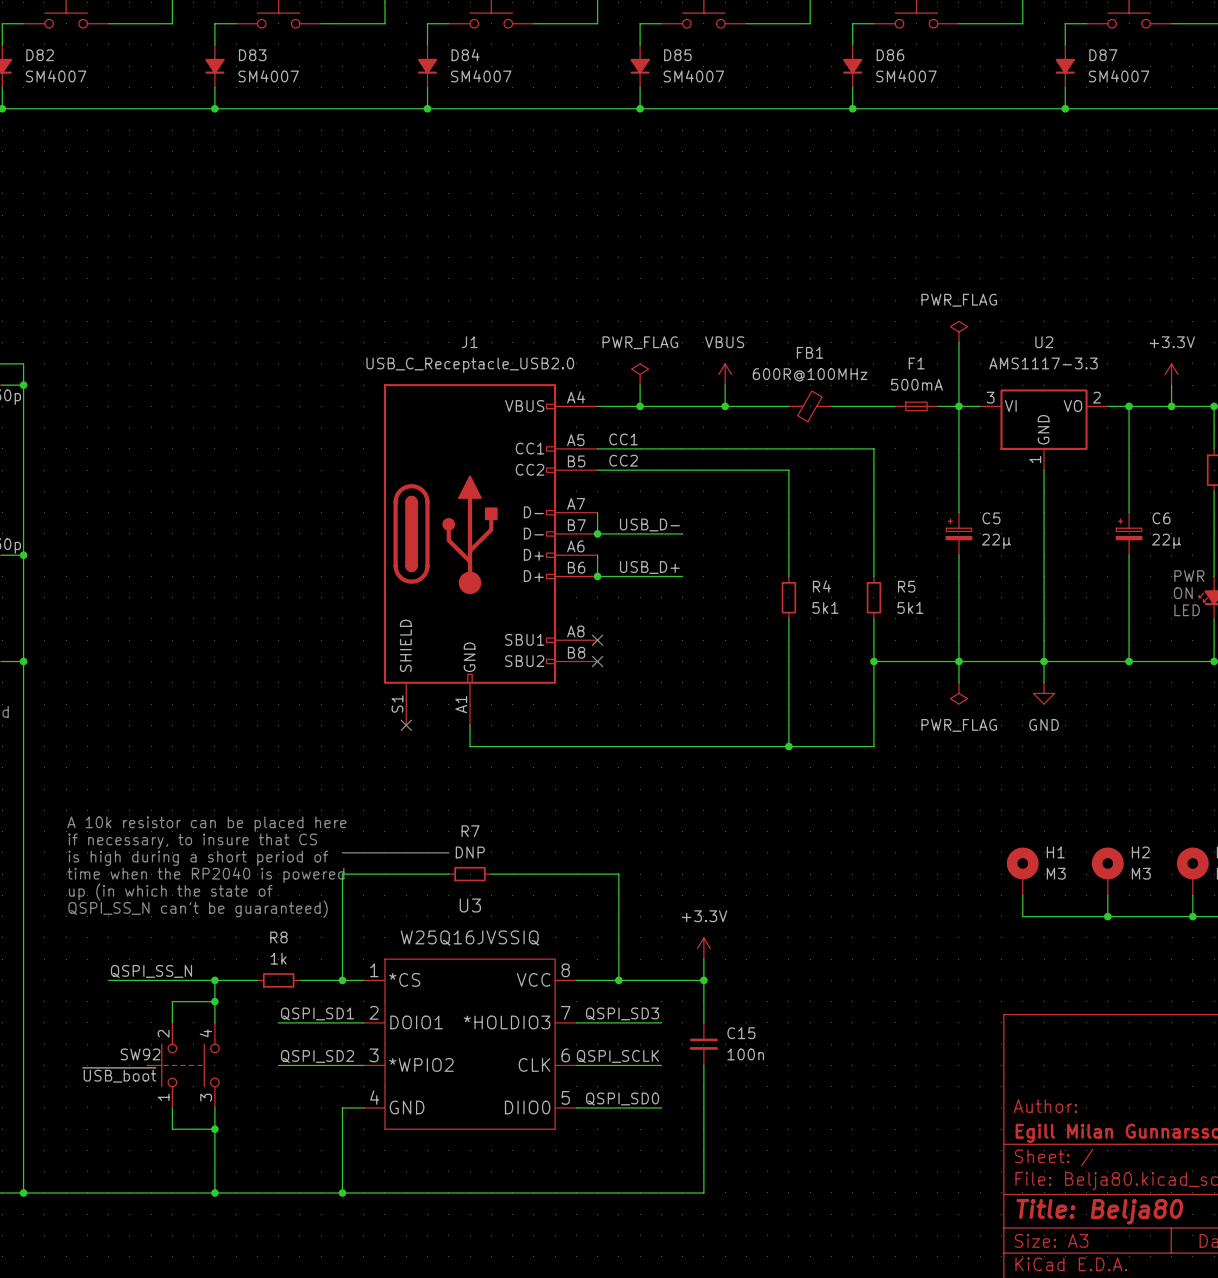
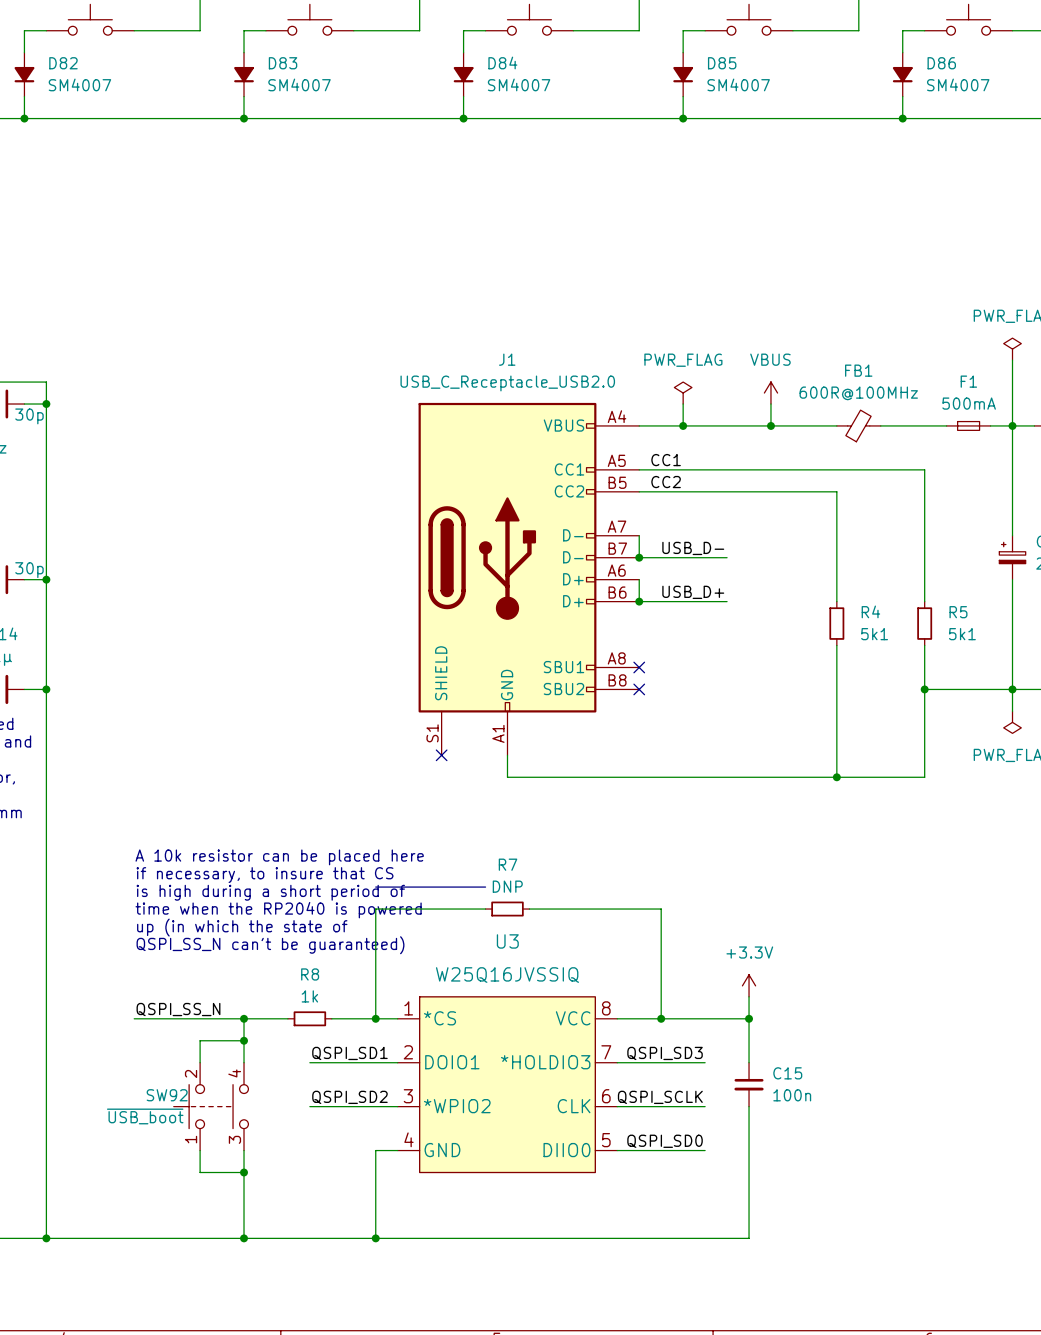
text position: A 10k resistor can be placed here (206, 824) -> A 10k resistor can be placed here (279, 857)
text position: if necessary, to insure that CS (192, 841) -> if necessary, to insure that CS (265, 875)
text position: is high during a short period of (198, 858) -> is high during a short period of (270, 892)
text position: time when the RP2040 is powered (205, 875) -> time when the RP2040 is powered (278, 910)
text position: up (in which the state of (170, 892) -> up (in which the state of (242, 927)
text position: QSPI_SS_N can't be guaranteed) (198, 909) -> QSPI_SS_N can't be guaranteed) (270, 945)

